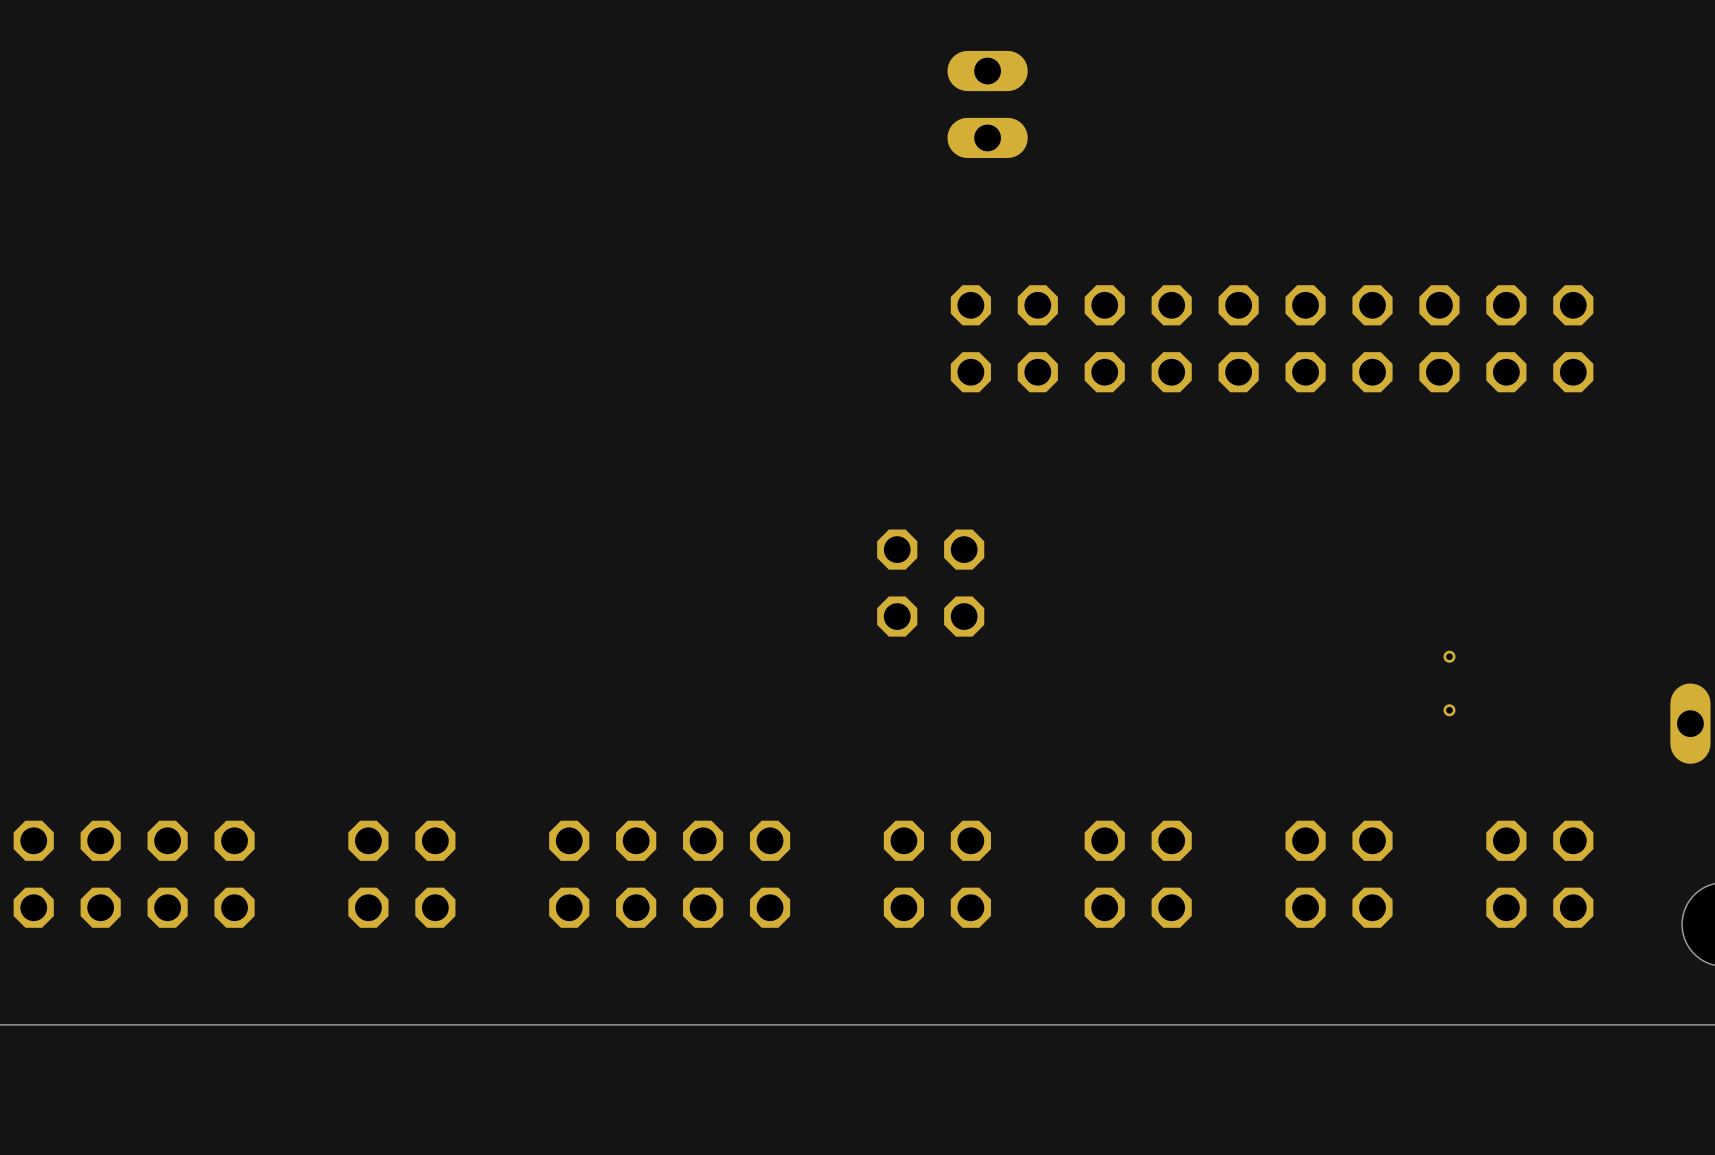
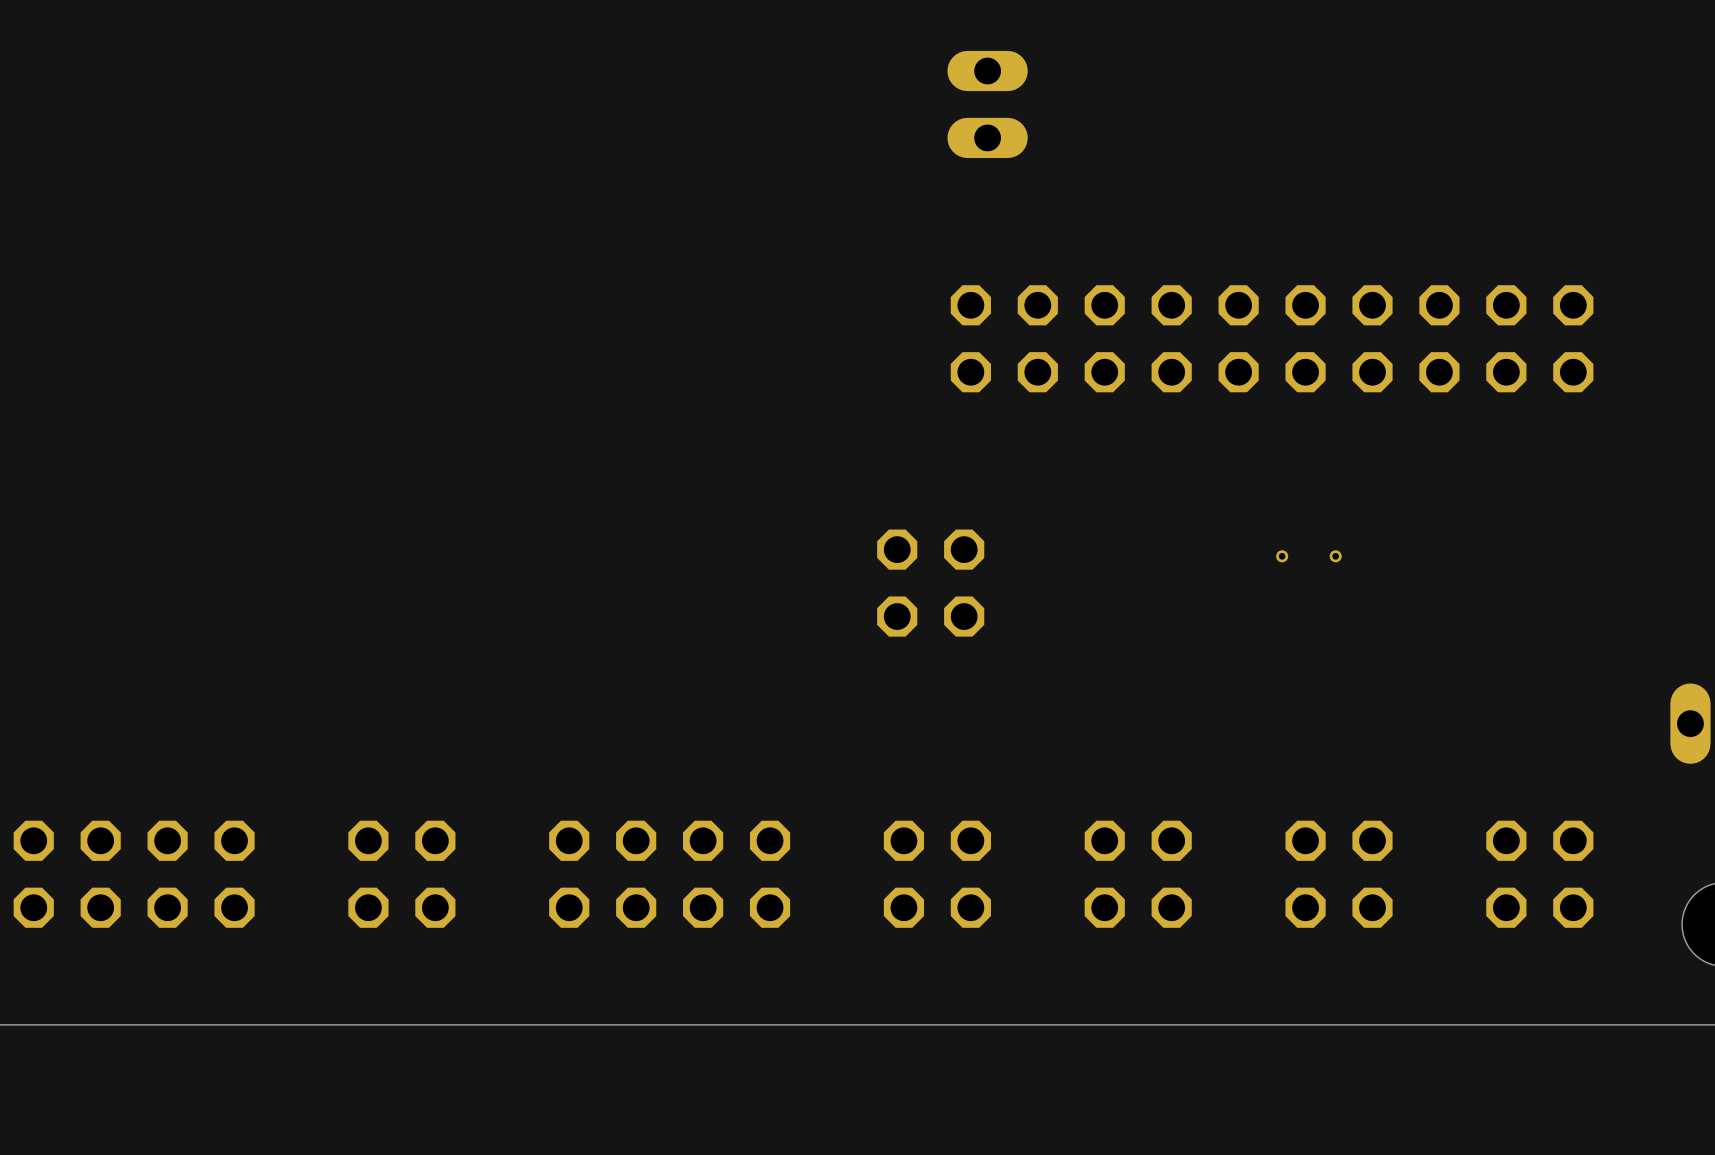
part: none -> (1282, 556)
part: none -> (1335, 556)
part: (1449, 656) -> none
part: (1449, 710) -> none

